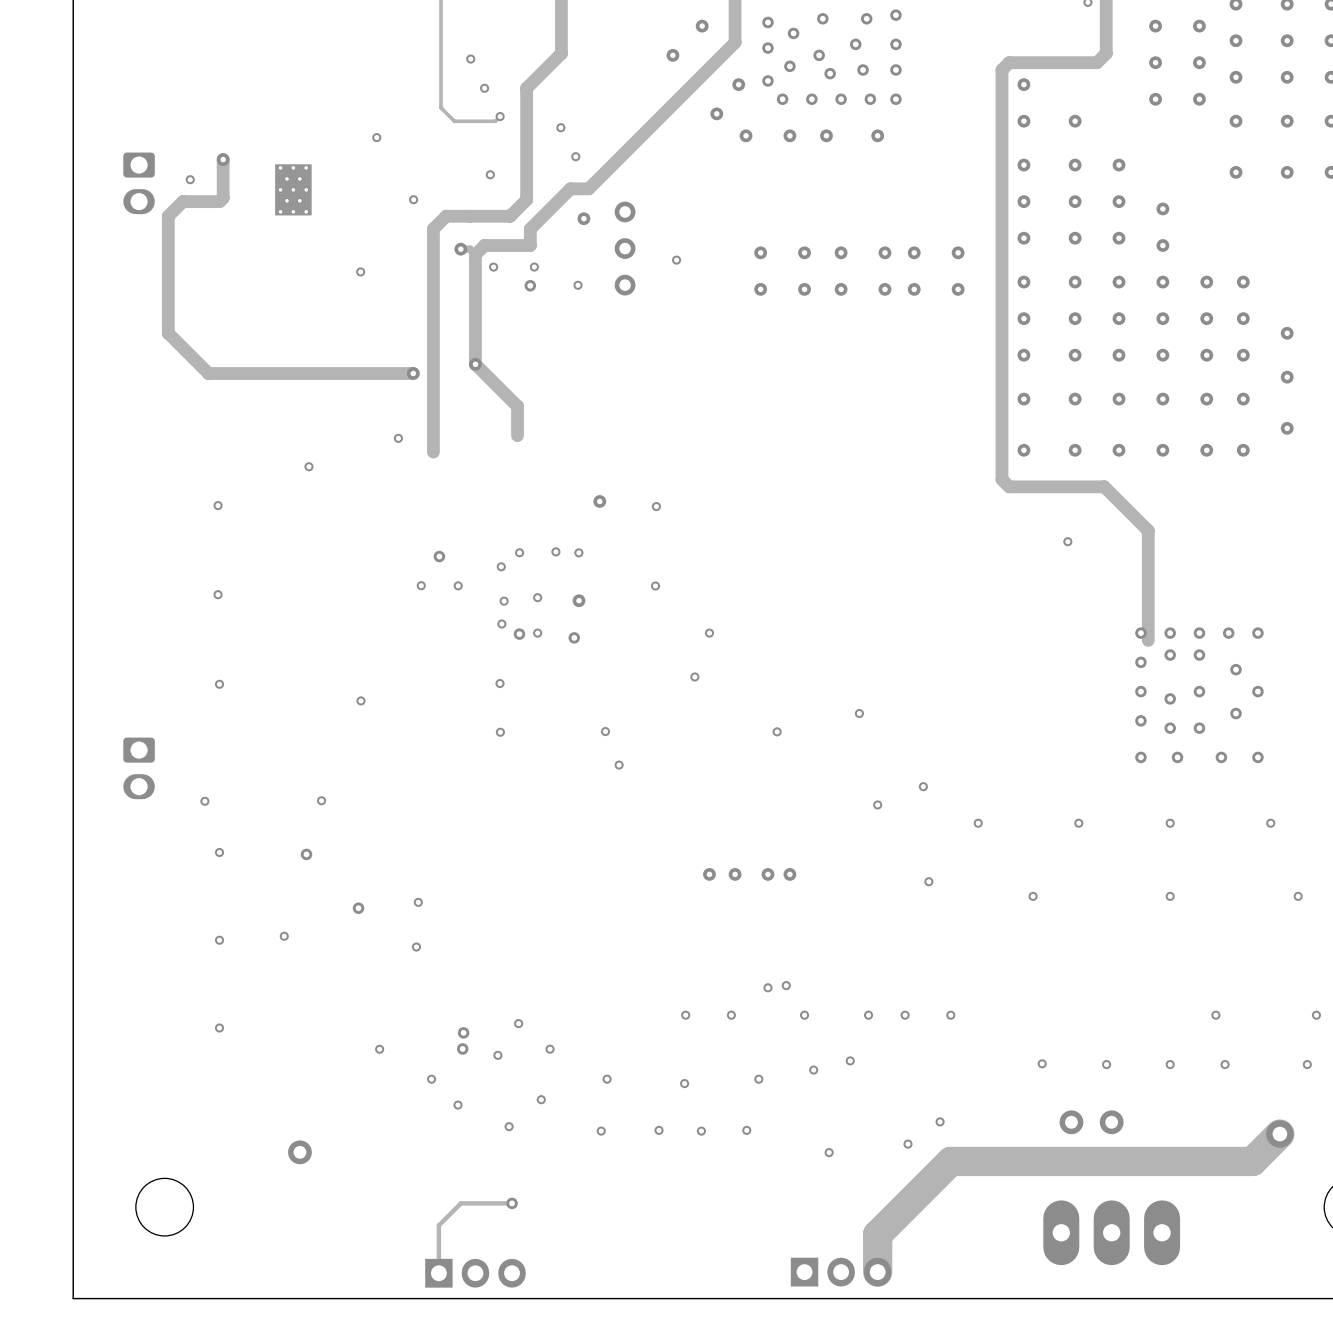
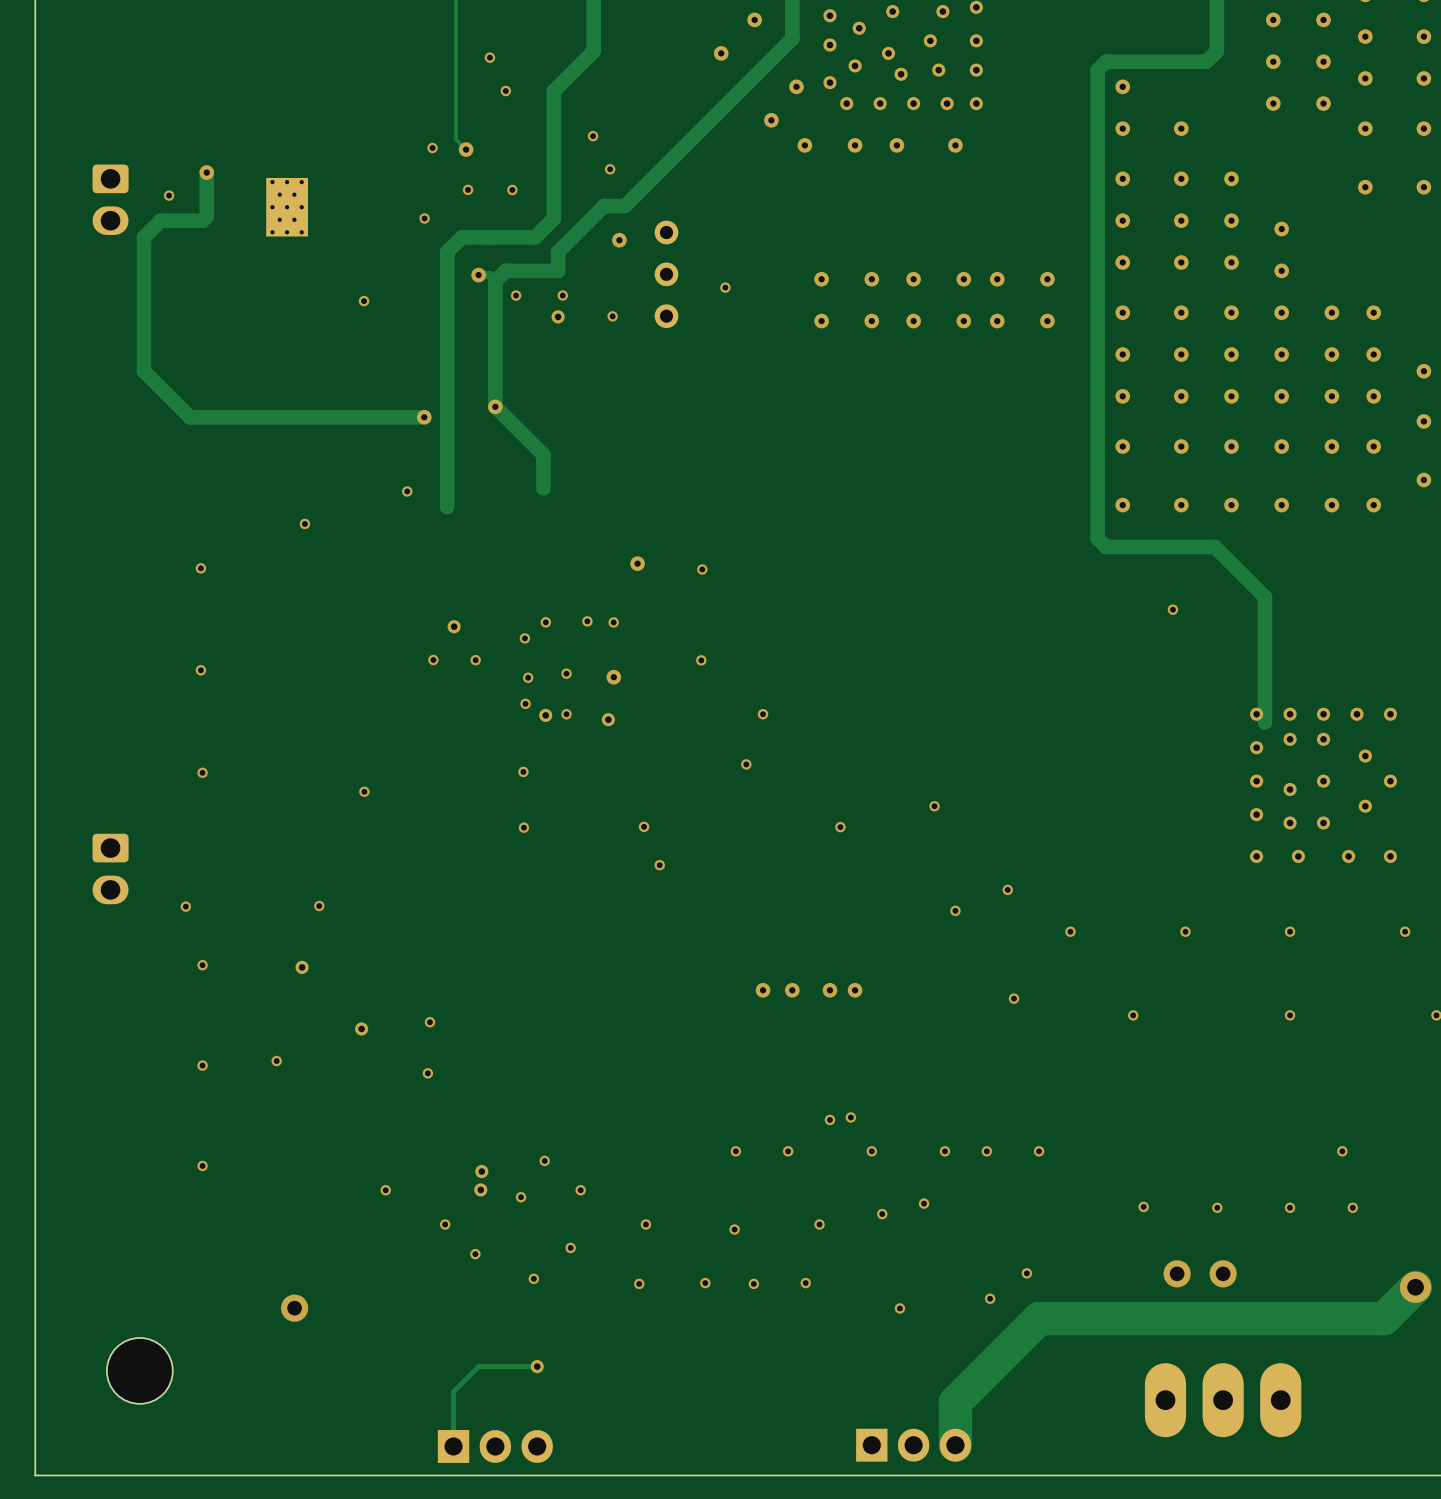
track: (441, 107) (454, 121) (495, 121) (500, 116) -> (455, 113) (455, 139) (466, 149)
via: (500, 116) -> none
via: (376, 137) -> none
via: none -> (432, 148)
via: none -> (466, 149)
via: none -> (468, 189)

